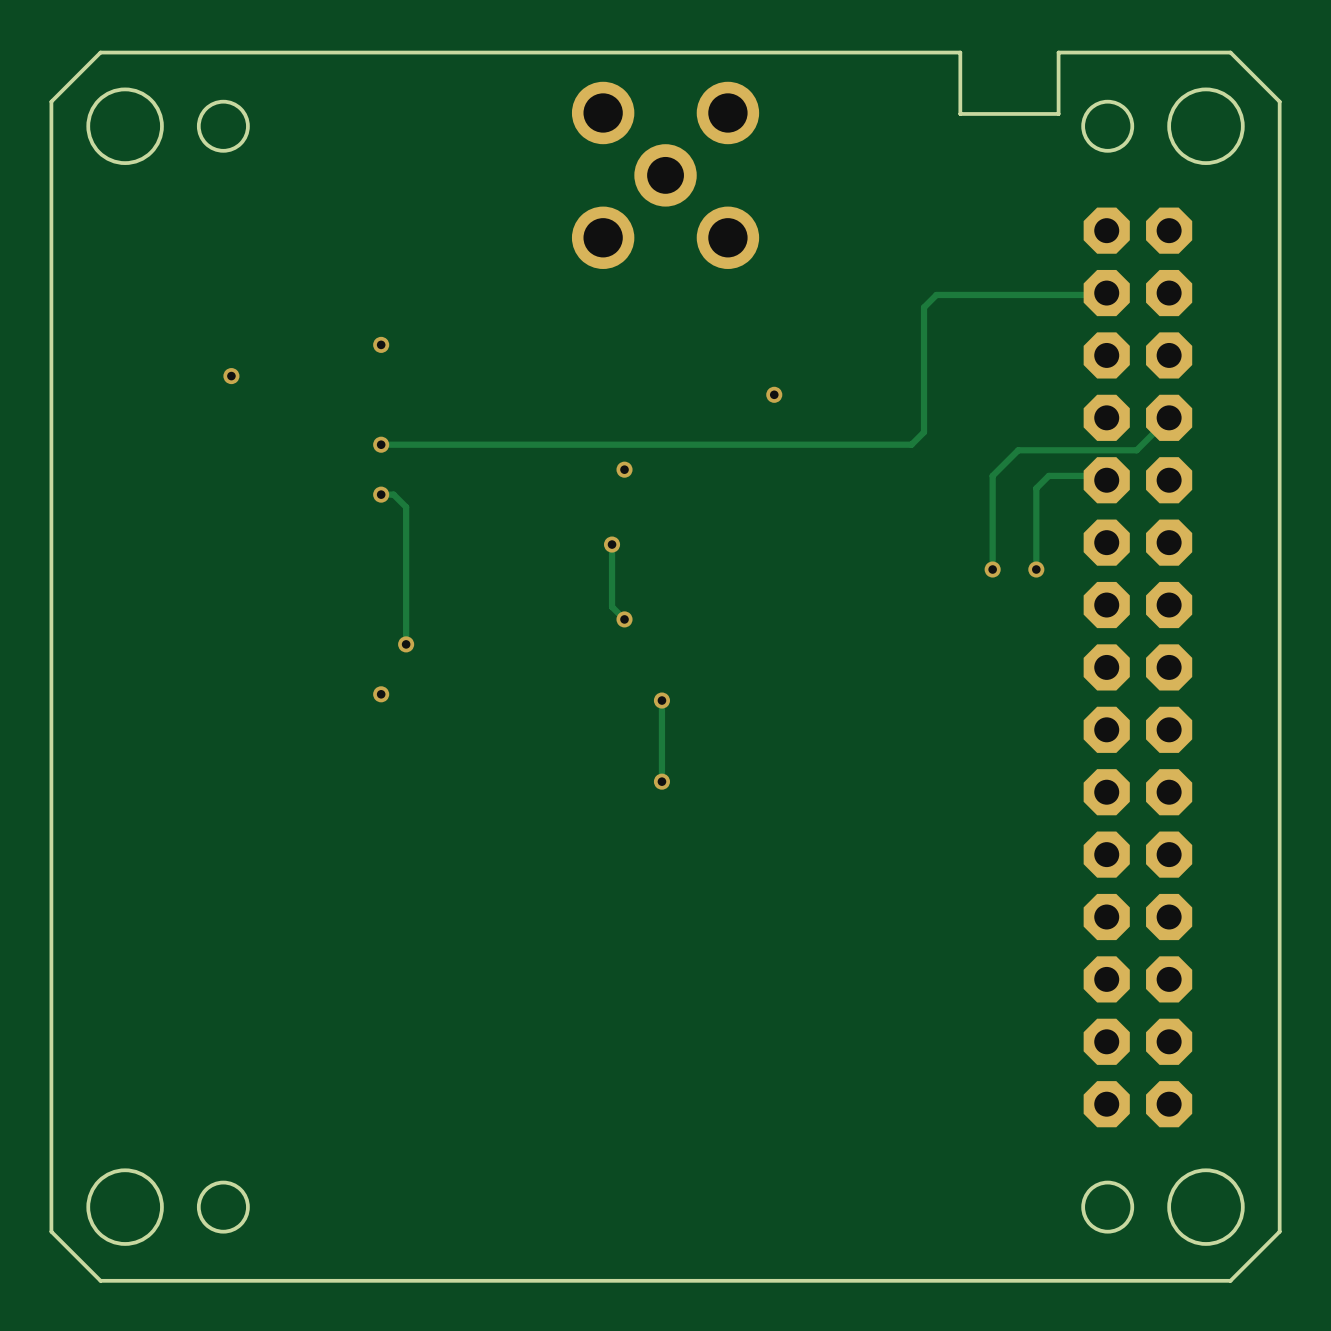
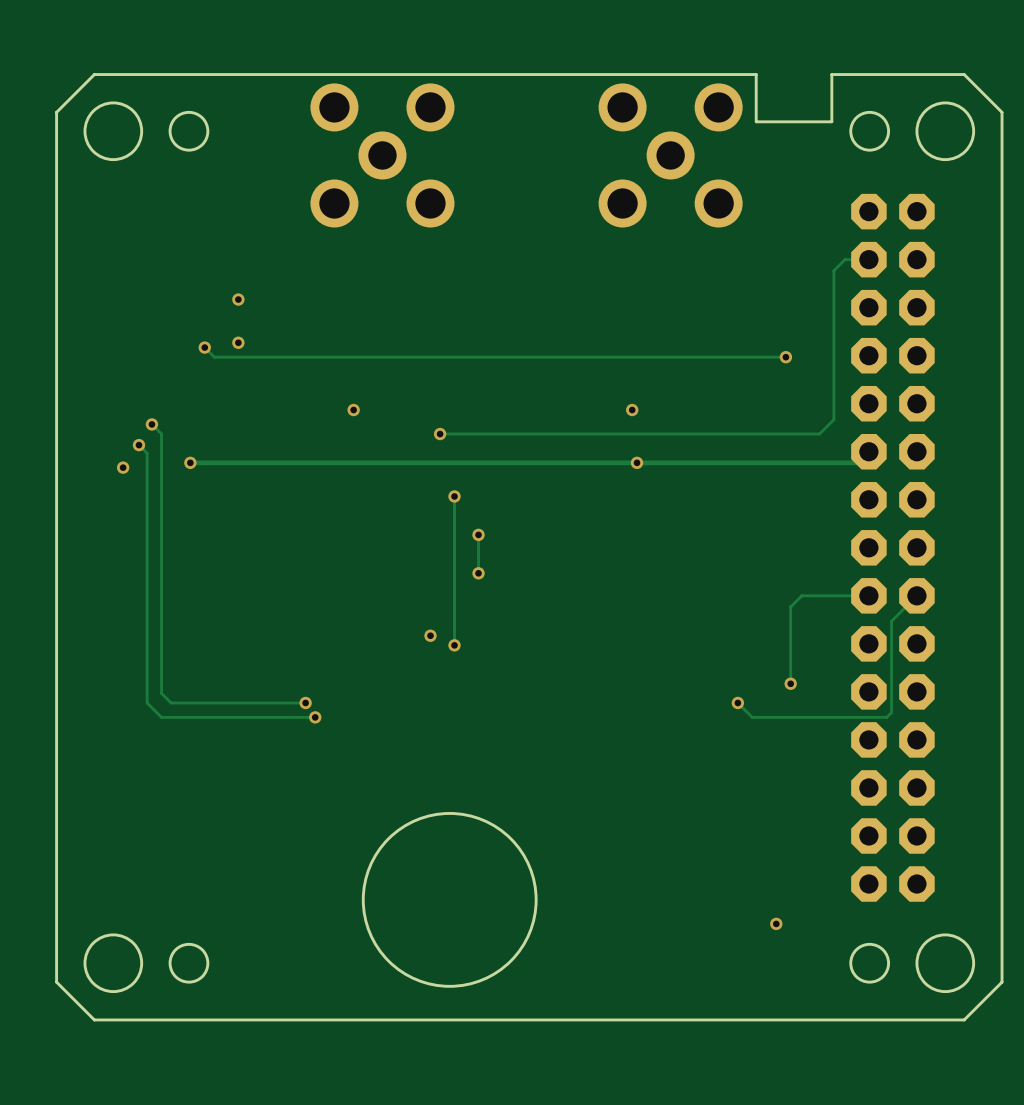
part: none -> (382, 155)
part: none -> (670, 155)
part: (665, 175) -> none
track: (1106, 293) (1104, 294) (936, 294) (924, 307) (924, 432) (911, 444) (381, 444) -> (868, 259) (845, 259) (833, 270) (833, 419) (819, 434) (440, 434)
via: none -> (238, 299)
via: (381, 344) -> none
via: (231, 376) -> none
via: (774, 394) -> none
via: none -> (238, 342)
track: none -> (204, 347) (214, 357) (785, 357)
via: none -> (204, 347)
track: (1169, 417) (1136, 450) (1018, 450) (992, 475) (992, 569) -> none
via: none -> (785, 357)
via: (381, 444) -> none
via: (624, 469) -> none
track: (1106, 480) (1102, 475) (1048, 475) (1036, 488) (1036, 569) -> none
via: none -> (353, 410)
via: none -> (632, 410)
track: (381, 494) (393, 494) (406, 507) (406, 644) -> none
via: (381, 494) -> none
track: none -> (151, 424) (161, 434) (161, 693) (171, 702) (305, 702)
via: none -> (151, 424)
via: none -> (440, 434)
track: none -> (139, 445) (147, 453) (147, 702) (161, 717) (315, 717)
via: none -> (139, 445)
track: none -> (868, 451) (857, 462) (190, 462)
track: (612, 544) (612, 606) (624, 619) -> none
via: (612, 544) -> none
via: none -> (190, 462)
via: none -> (637, 462)
via: none -> (123, 467)
via: (992, 569) -> none
via: (1036, 569) -> none
track: none -> (454, 496) (454, 645)
via: none -> (454, 496)
via: (624, 619) -> none
via: (406, 644) -> none
track: none -> (478, 534) (478, 573)
via: none -> (478, 534)
via: (381, 694) -> none
via: none -> (478, 573)
track: (661, 700) (661, 781) -> none
via: (661, 700) -> none
track: none -> (868, 595) (801, 595) (790, 606) (790, 683)
track: none -> (916, 595) (891, 621) (891, 712) (886, 717) (752, 717) (737, 702)
via: none -> (430, 635)
via: (661, 781) -> none
via: none -> (454, 645)
via: none -> (790, 683)
via: none -> (305, 702)
via: none -> (737, 702)
via: none -> (315, 717)
round board edge: none -> [361, 812, 538, 988]
via: none -> (776, 923)

